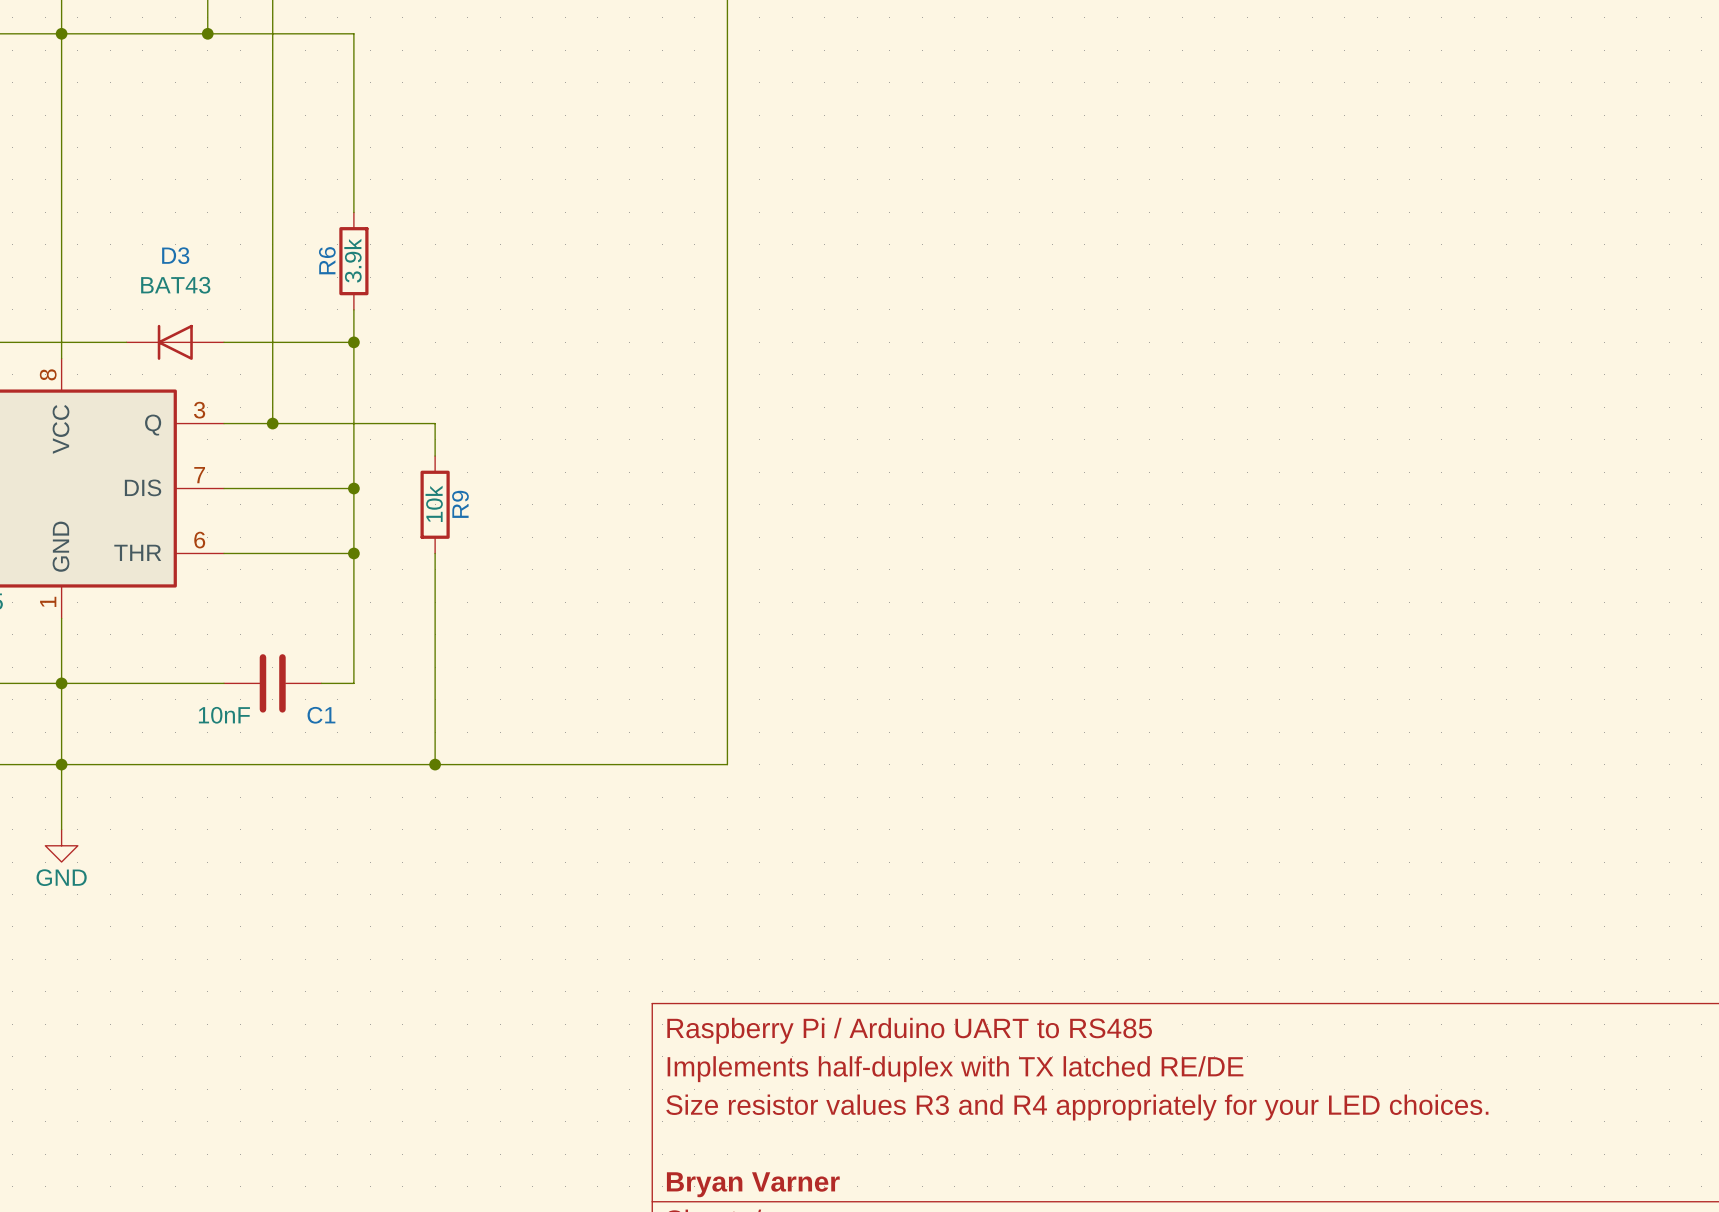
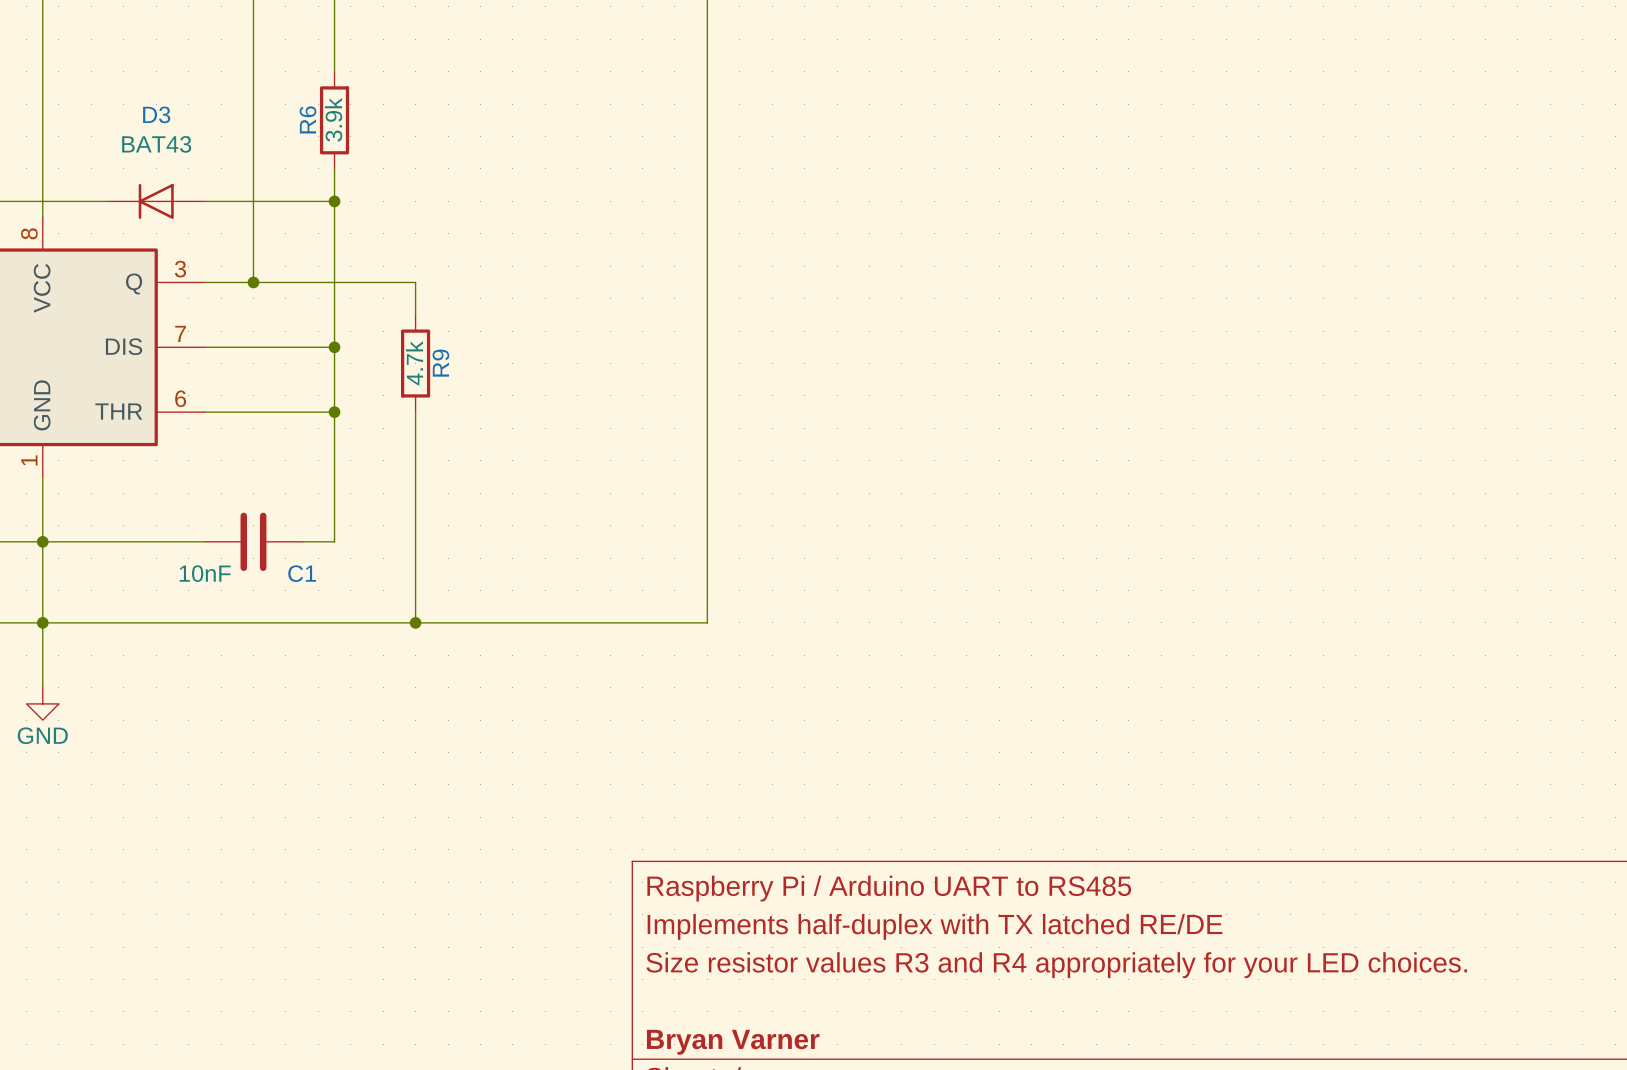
R9 value: 10k (434, 503) -> 4.7k (414, 363)

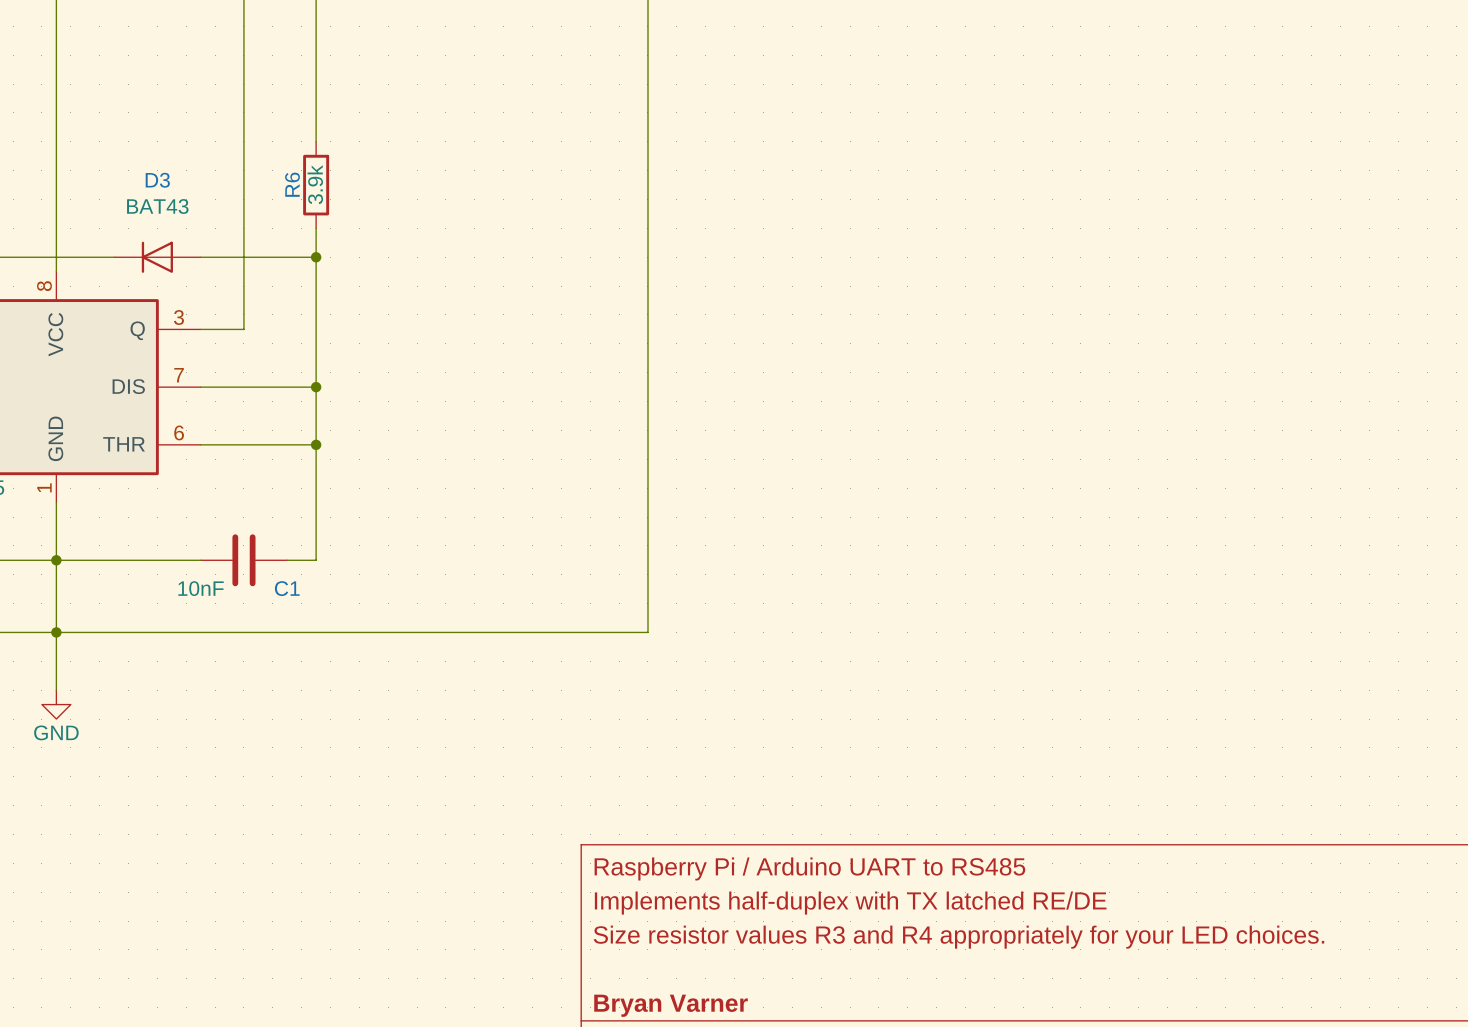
wire: (253, 282) (415, 282) (415, 314) -> none
junction: (253, 282) -> none
R9: 4.7k (415, 363) -> none
wire: (415, 412) (415, 622) -> none
junction: (415, 622) -> none

